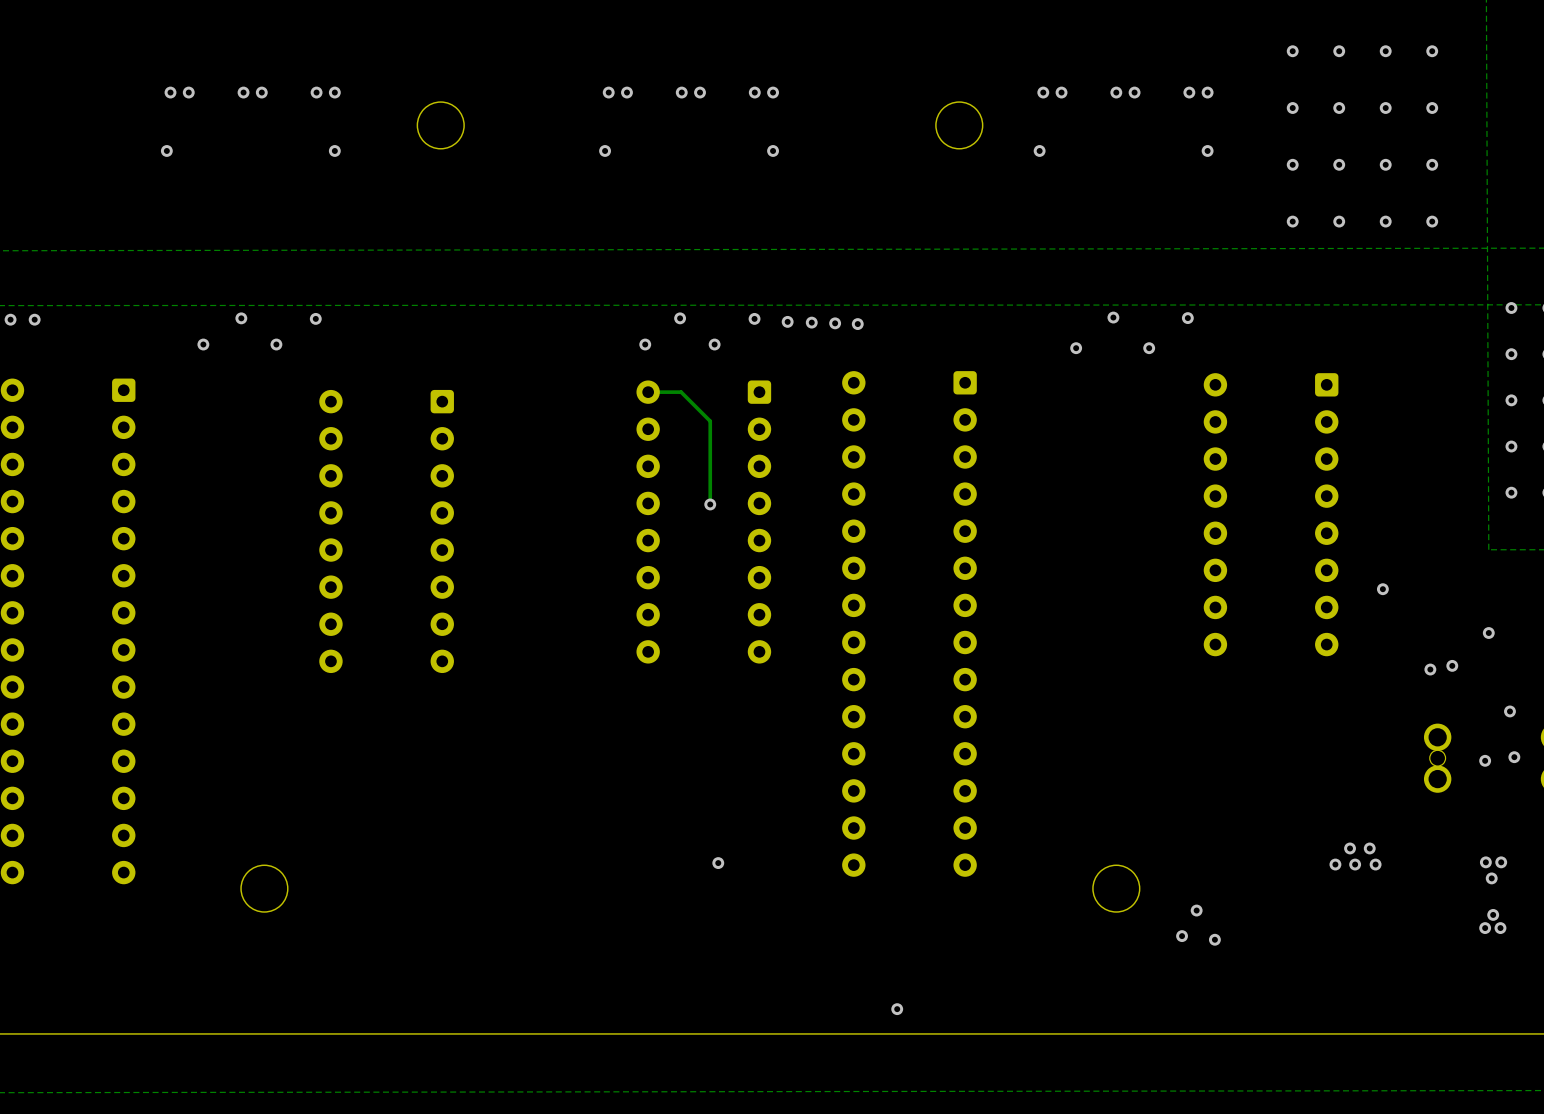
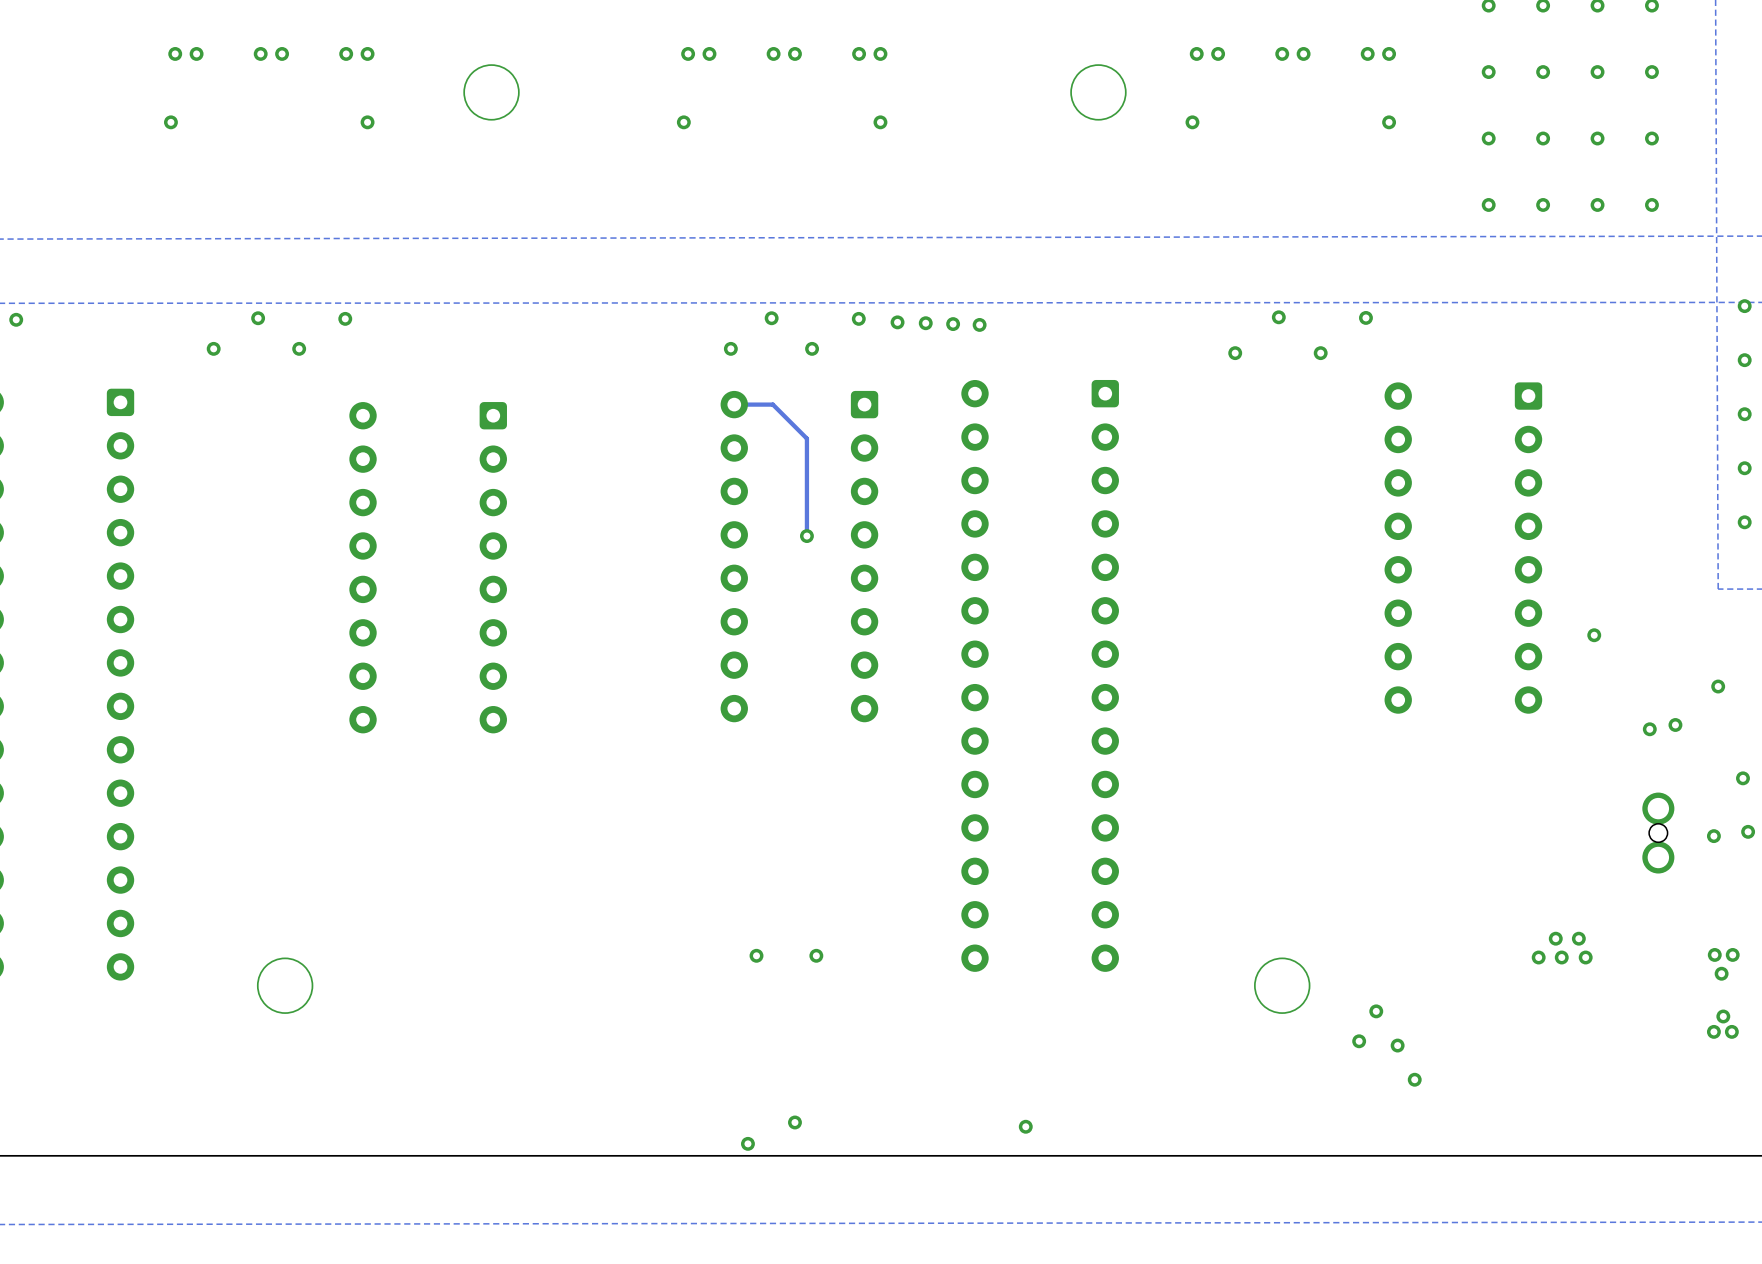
via: none -> (756, 955)
via: none -> (1414, 1079)
via: none -> (794, 1122)
via: none -> (747, 1143)

